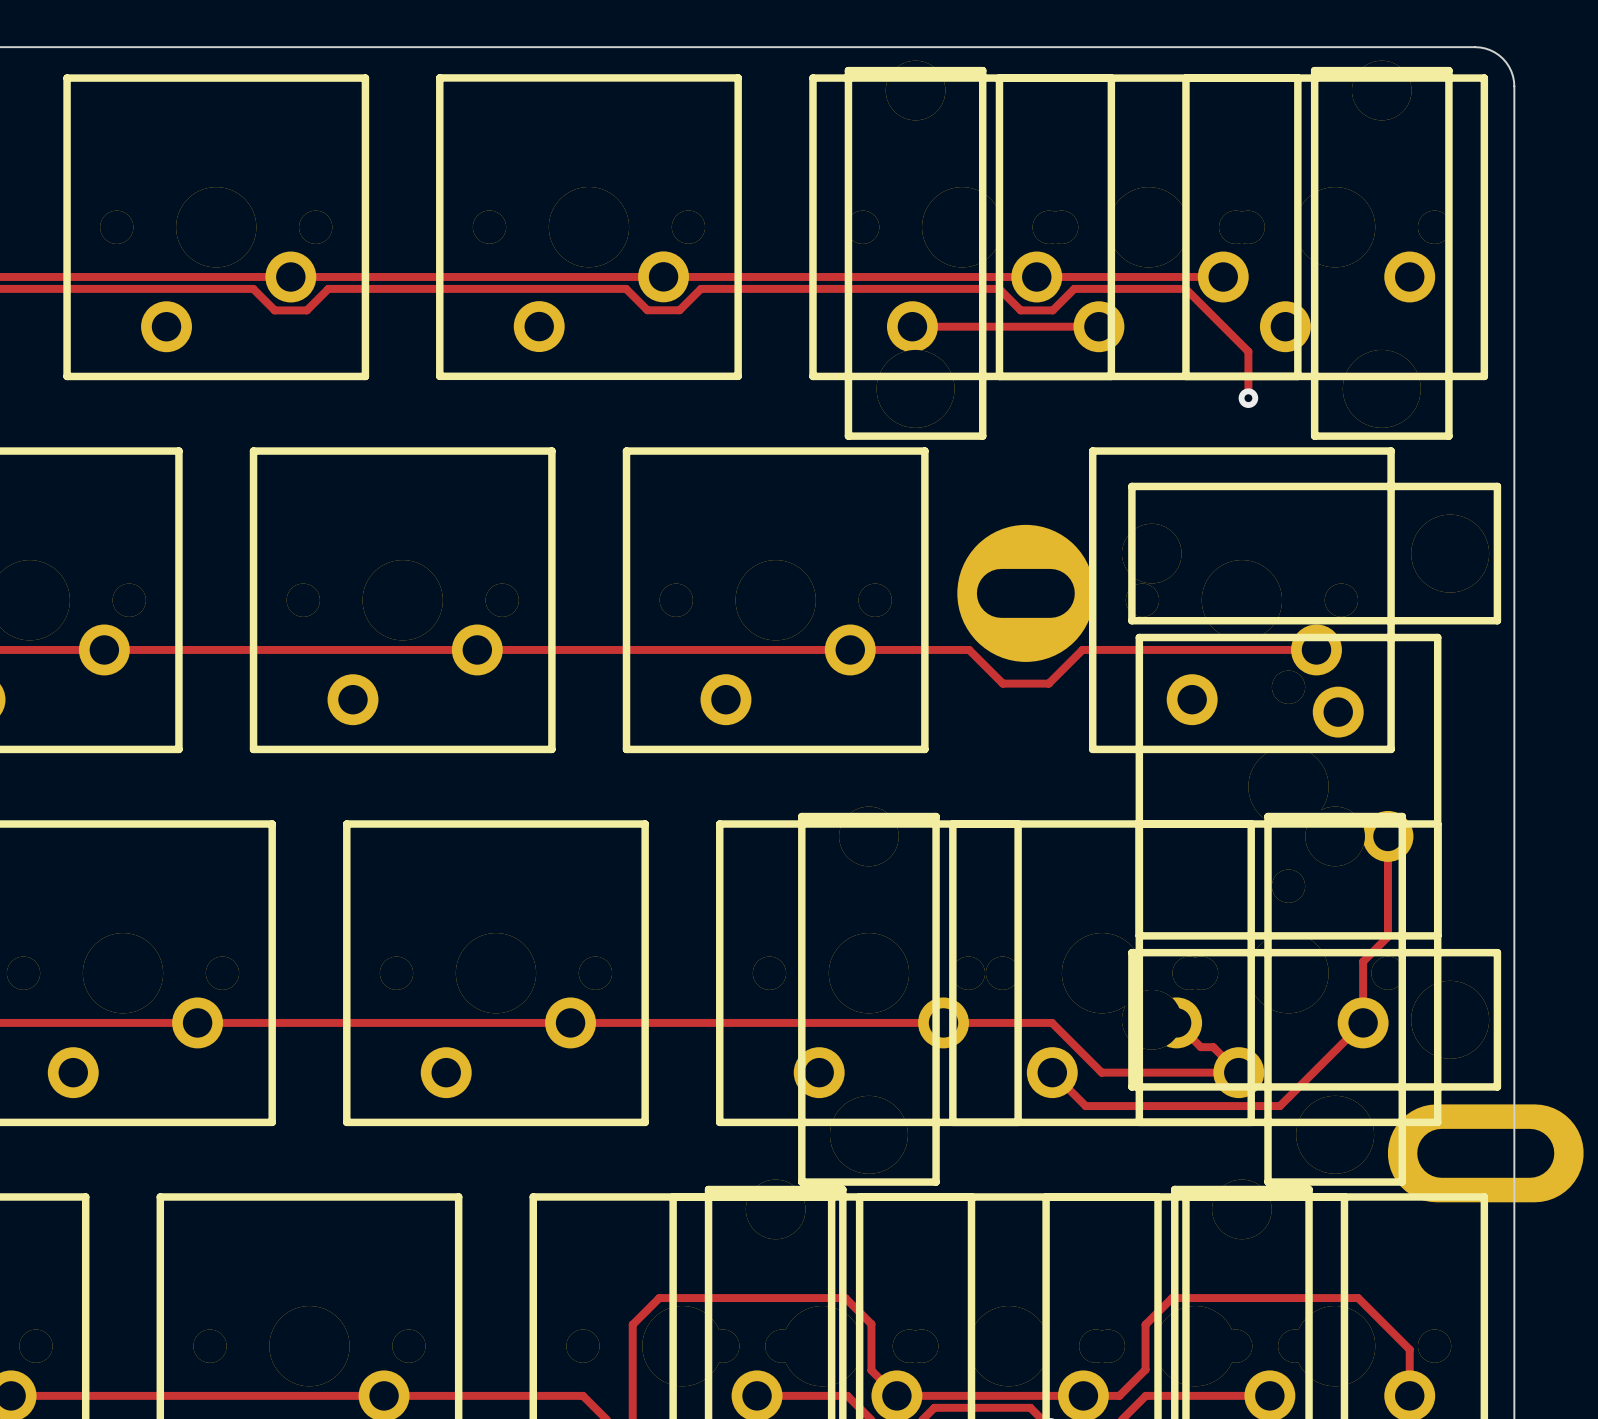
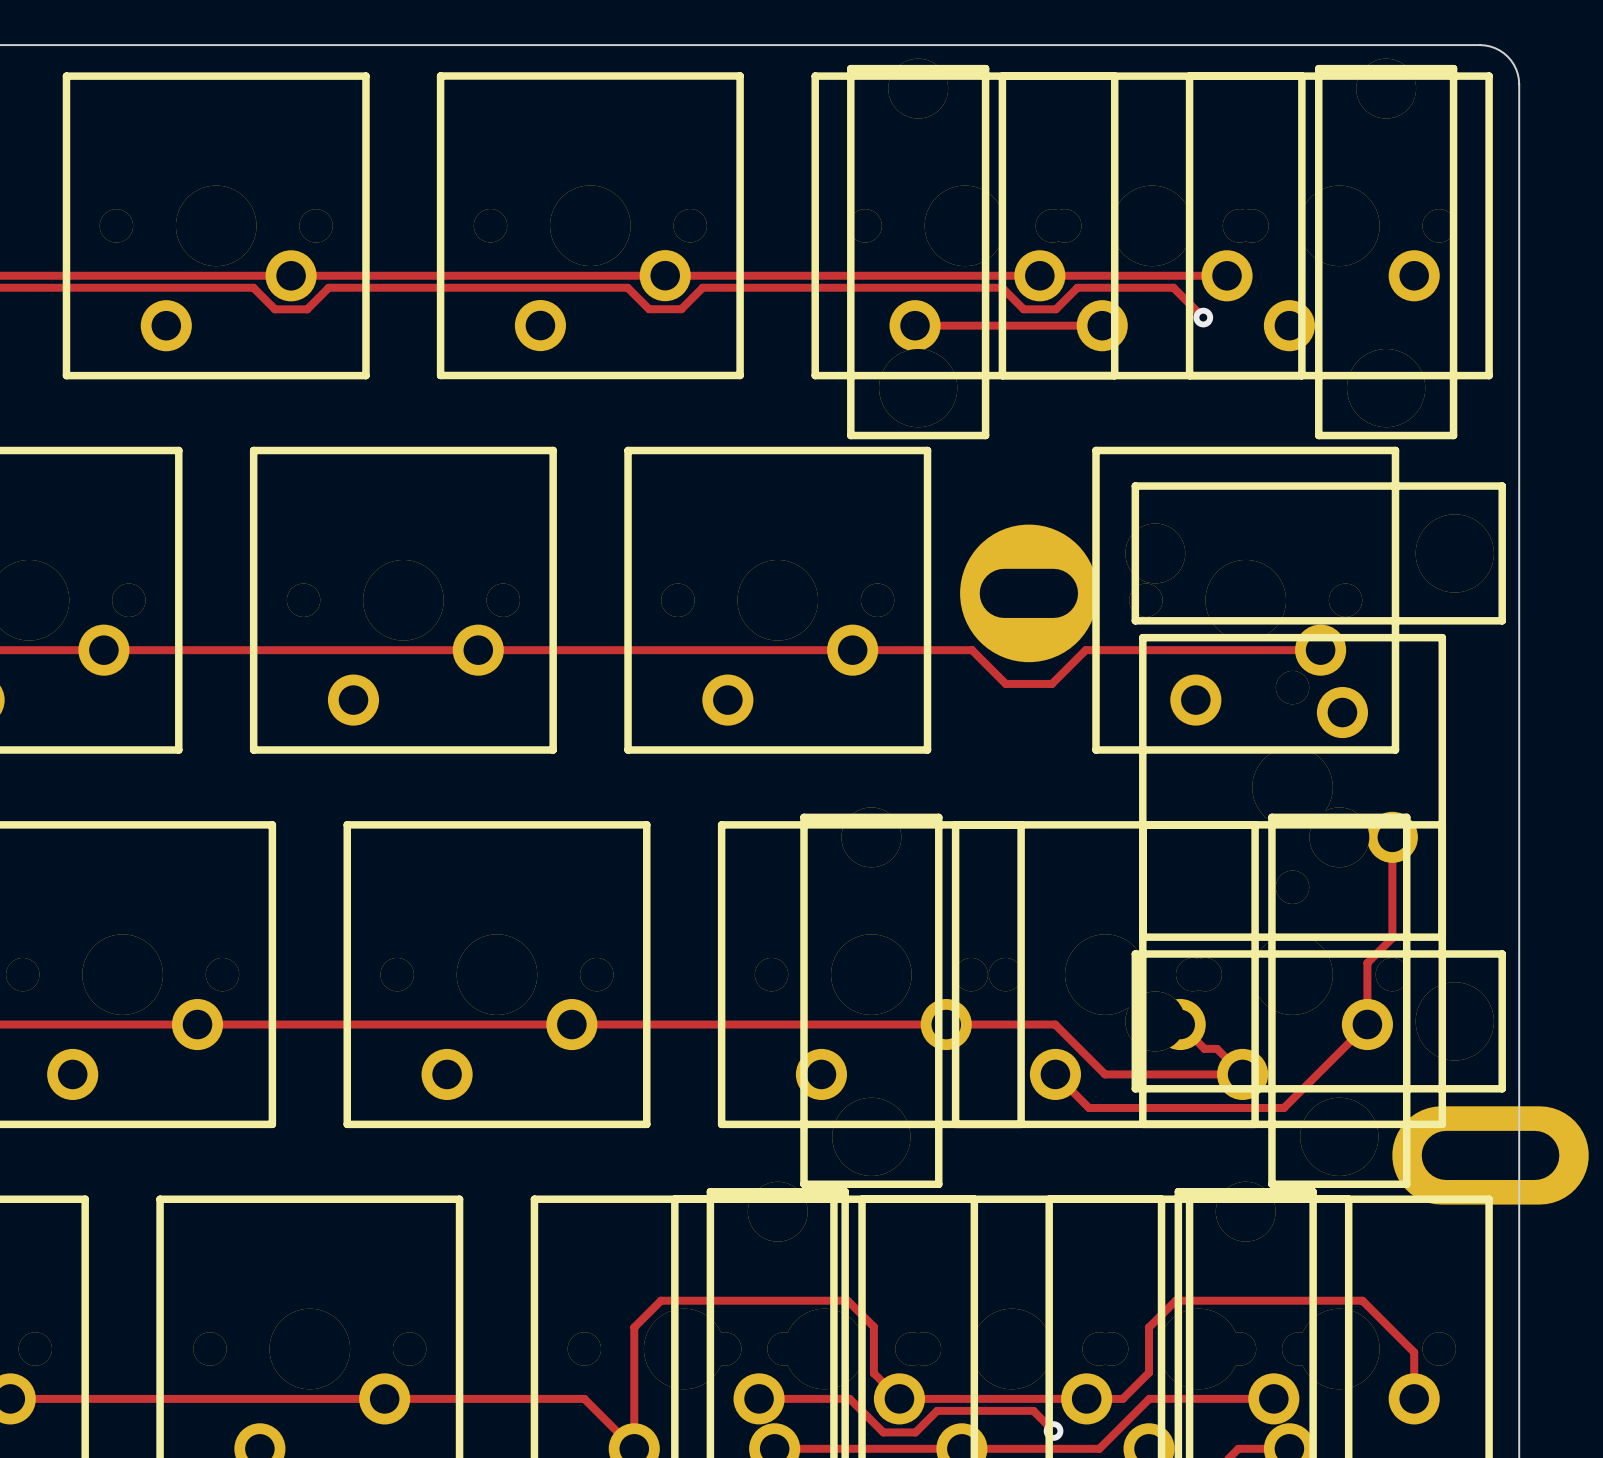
track: (1169, 288) (1185, 288) (1248, 351) (1248, 398) -> (1173, 287) (1203, 317)
via position: (1248, 398) -> (1203, 317)

